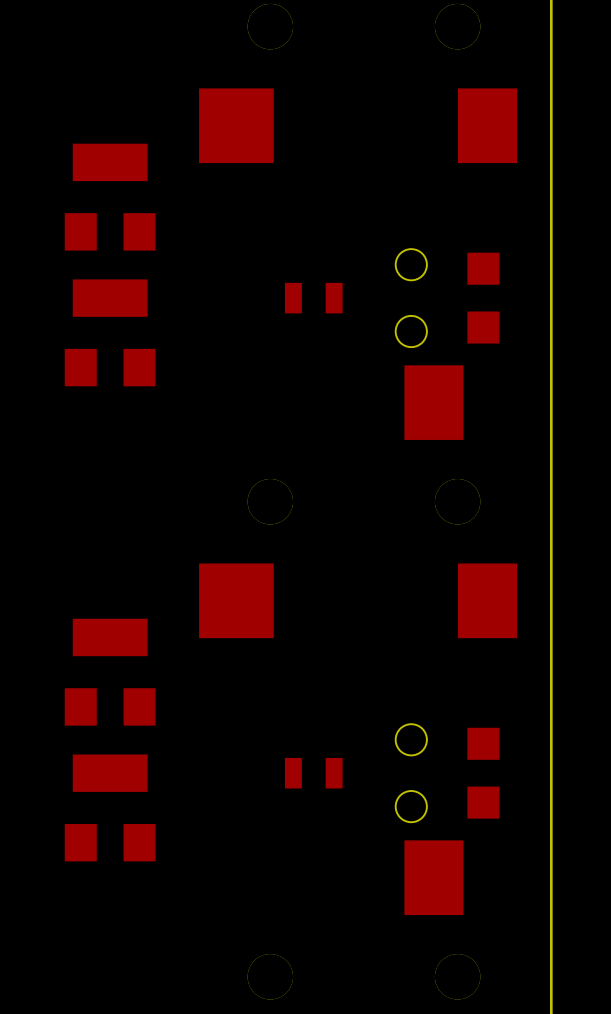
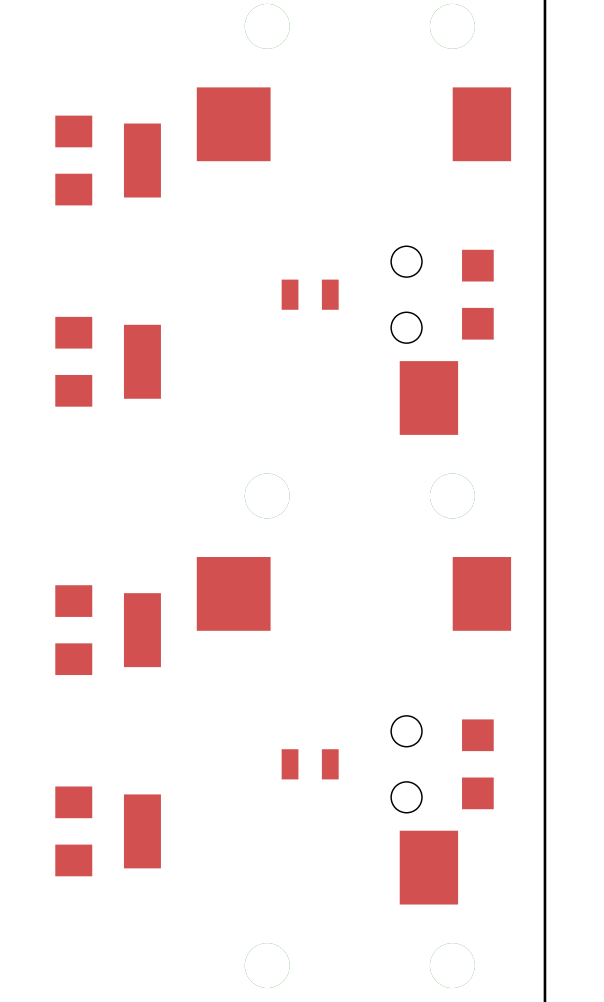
part rotation: 0° (110, 197) -> 90° clockwise (108, 160)
part rotation: 0° (110, 332) -> 90° clockwise (108, 361)
part rotation: 0° (110, 672) -> 90° clockwise (108, 630)
part rotation: 0° (110, 807) -> 90° clockwise (108, 831)

